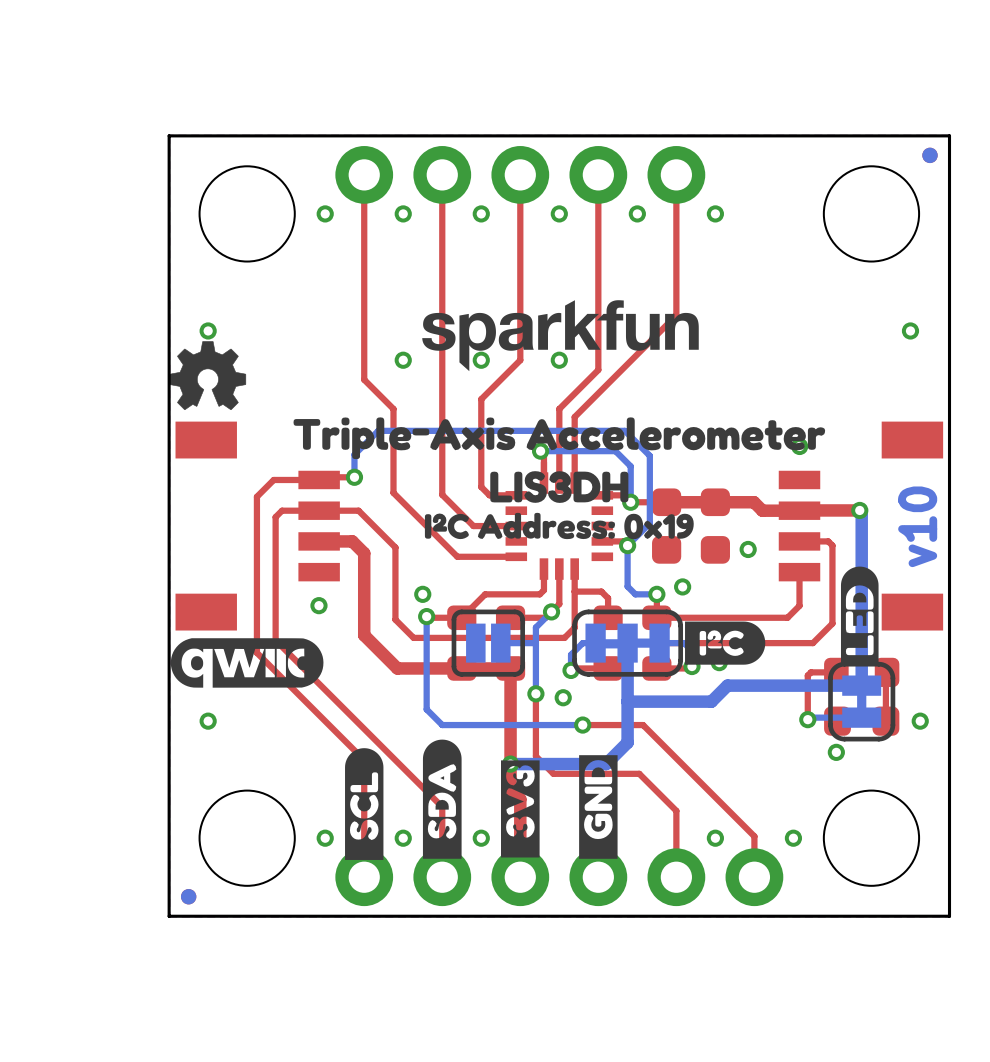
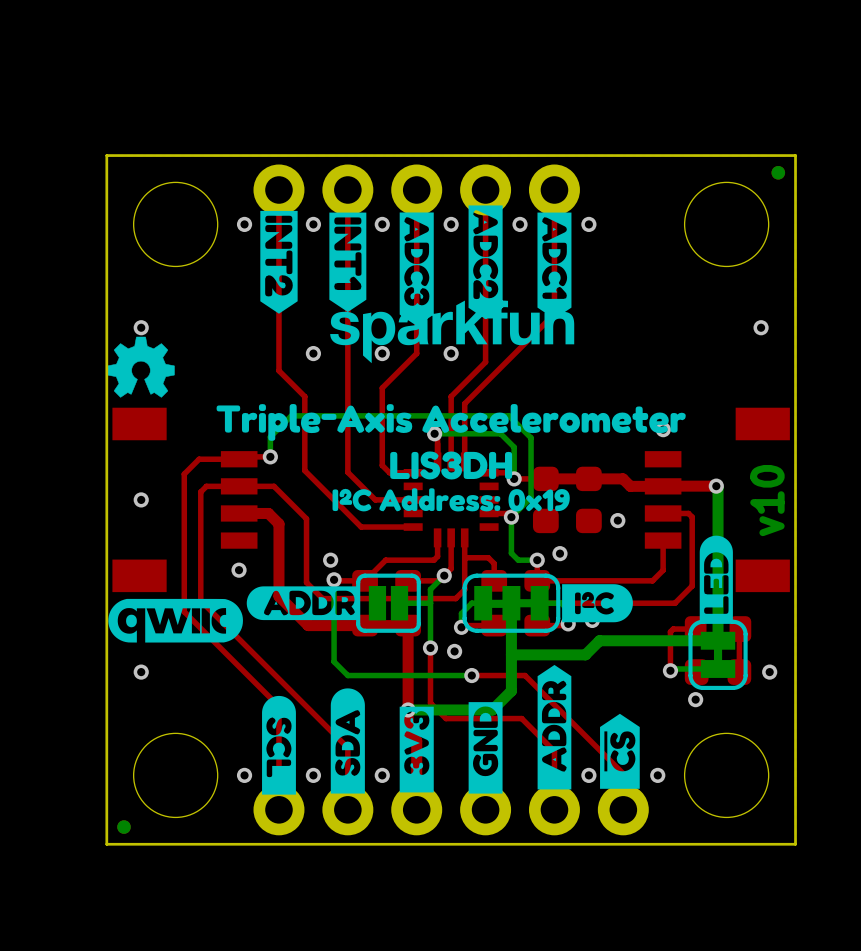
drawing: none -> [468, 205, 503, 320]
drawing: none -> [260, 210, 367, 314]
drawing: none -> [399, 212, 434, 326]
drawing: none -> [537, 212, 572, 319]
via: none -> (141, 499)
drawing: none -> [246, 586, 360, 621]
drawing: none -> [537, 664, 640, 790]
drawing shape: [345, 748, 384, 860] -> [262, 695, 296, 795]

